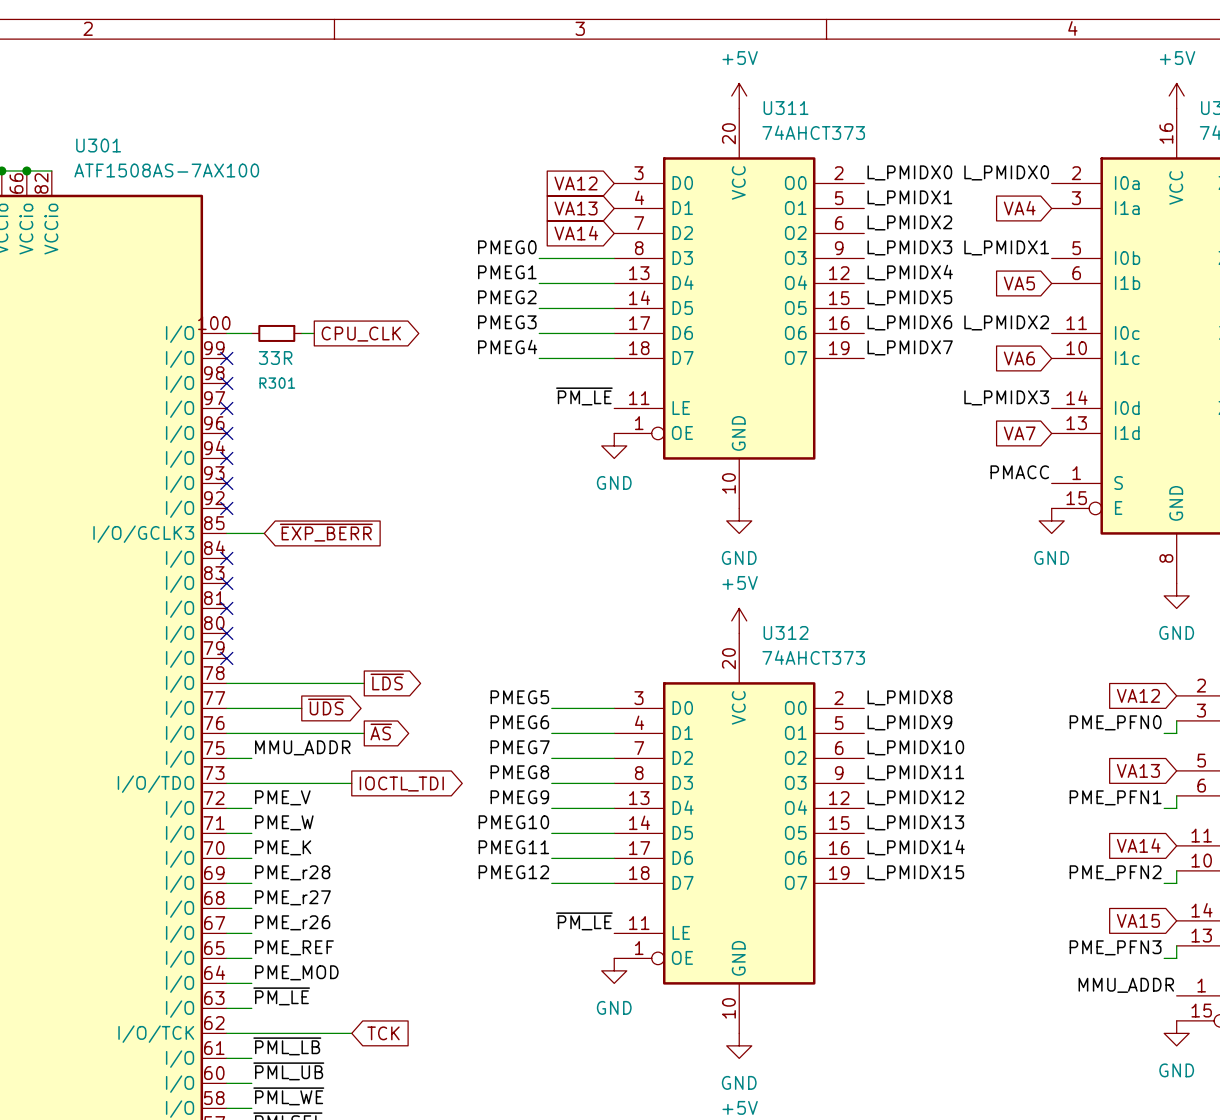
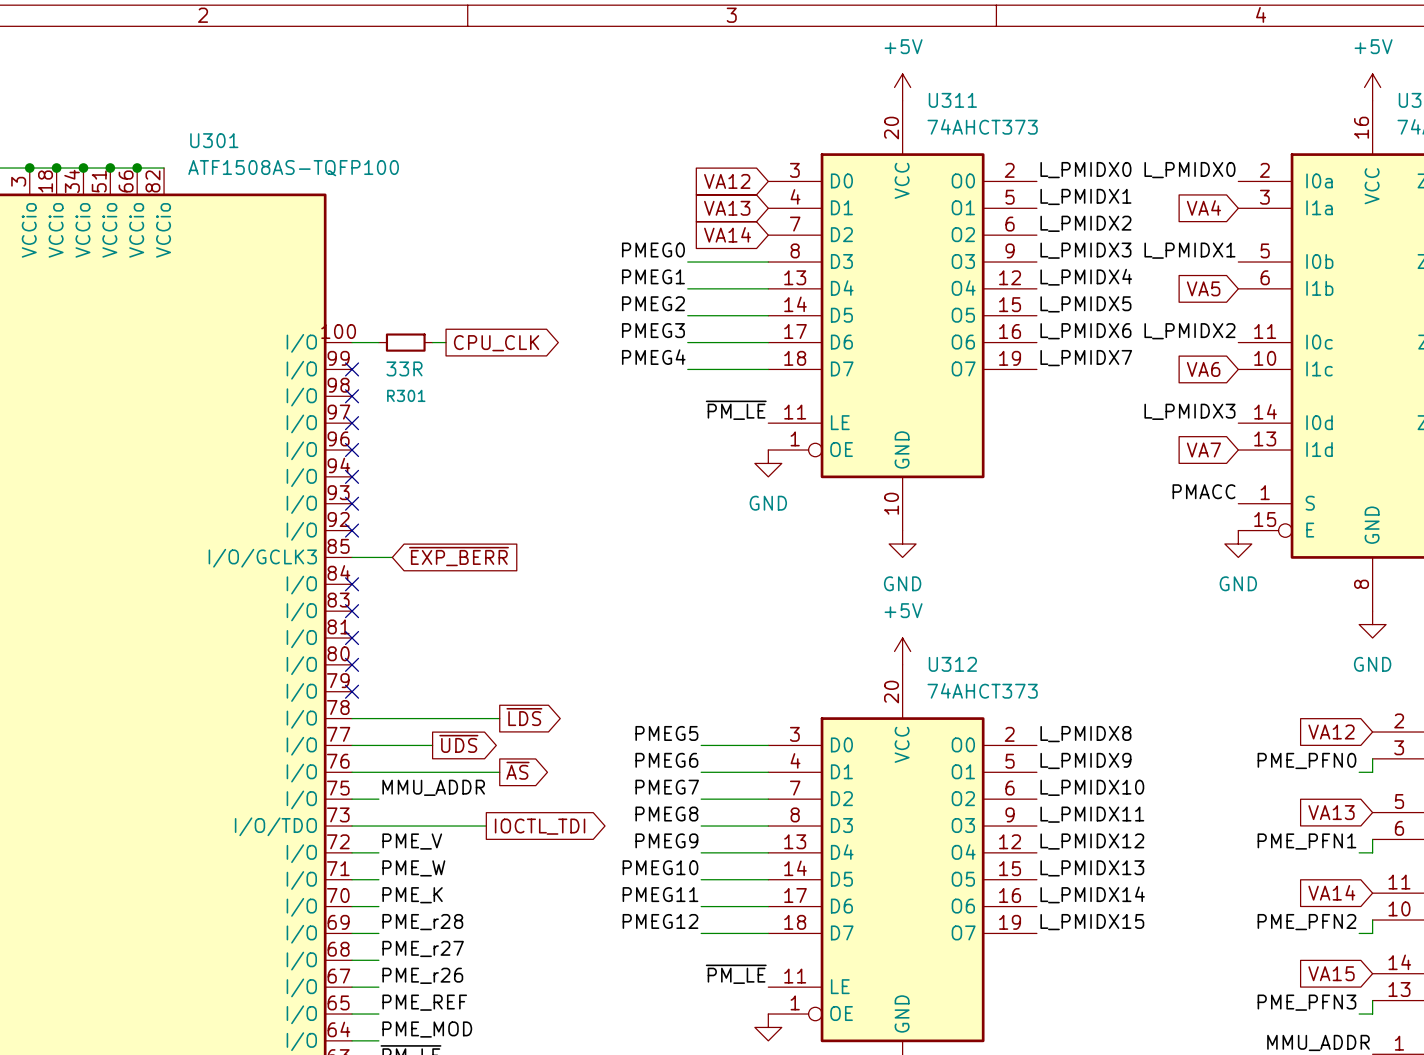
U301 value: ATF1508AS-7AX100 (166, 170) -> ATF1508AS-TQFP100 (293, 168)

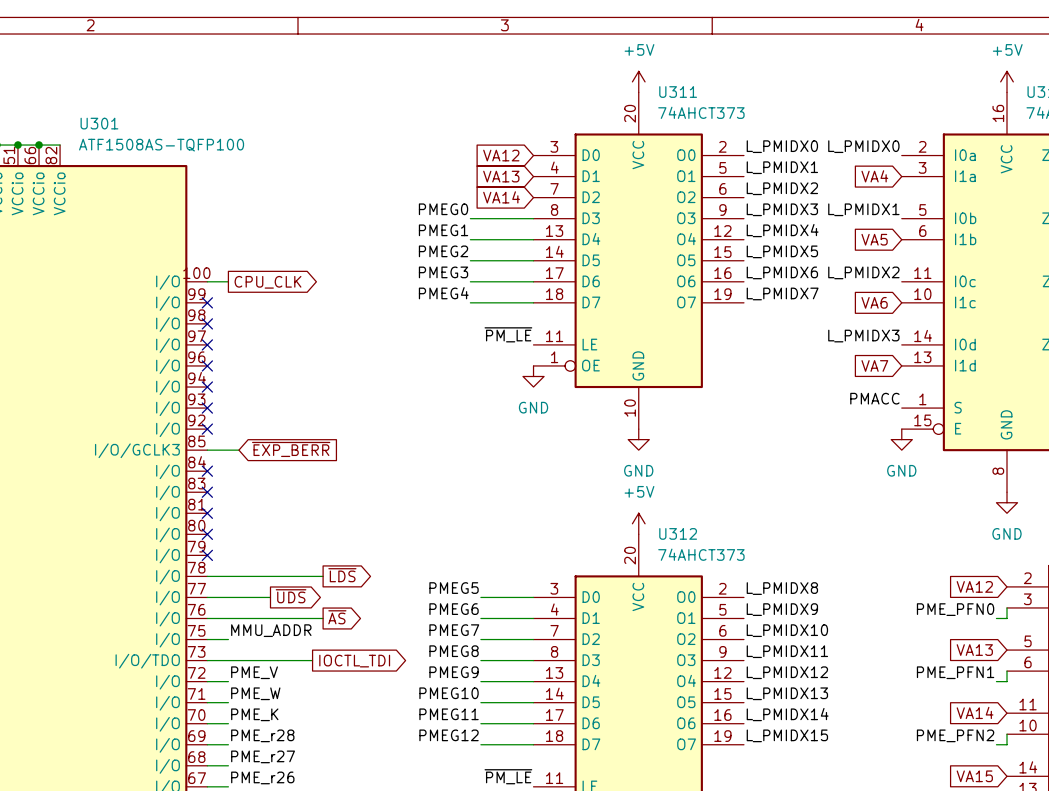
R301: 33R (405, 342) -> none
wire: (432, 342) (446, 342) -> none
global label position: CPU_CLK (496, 343) -> CPU_CLK (268, 282)

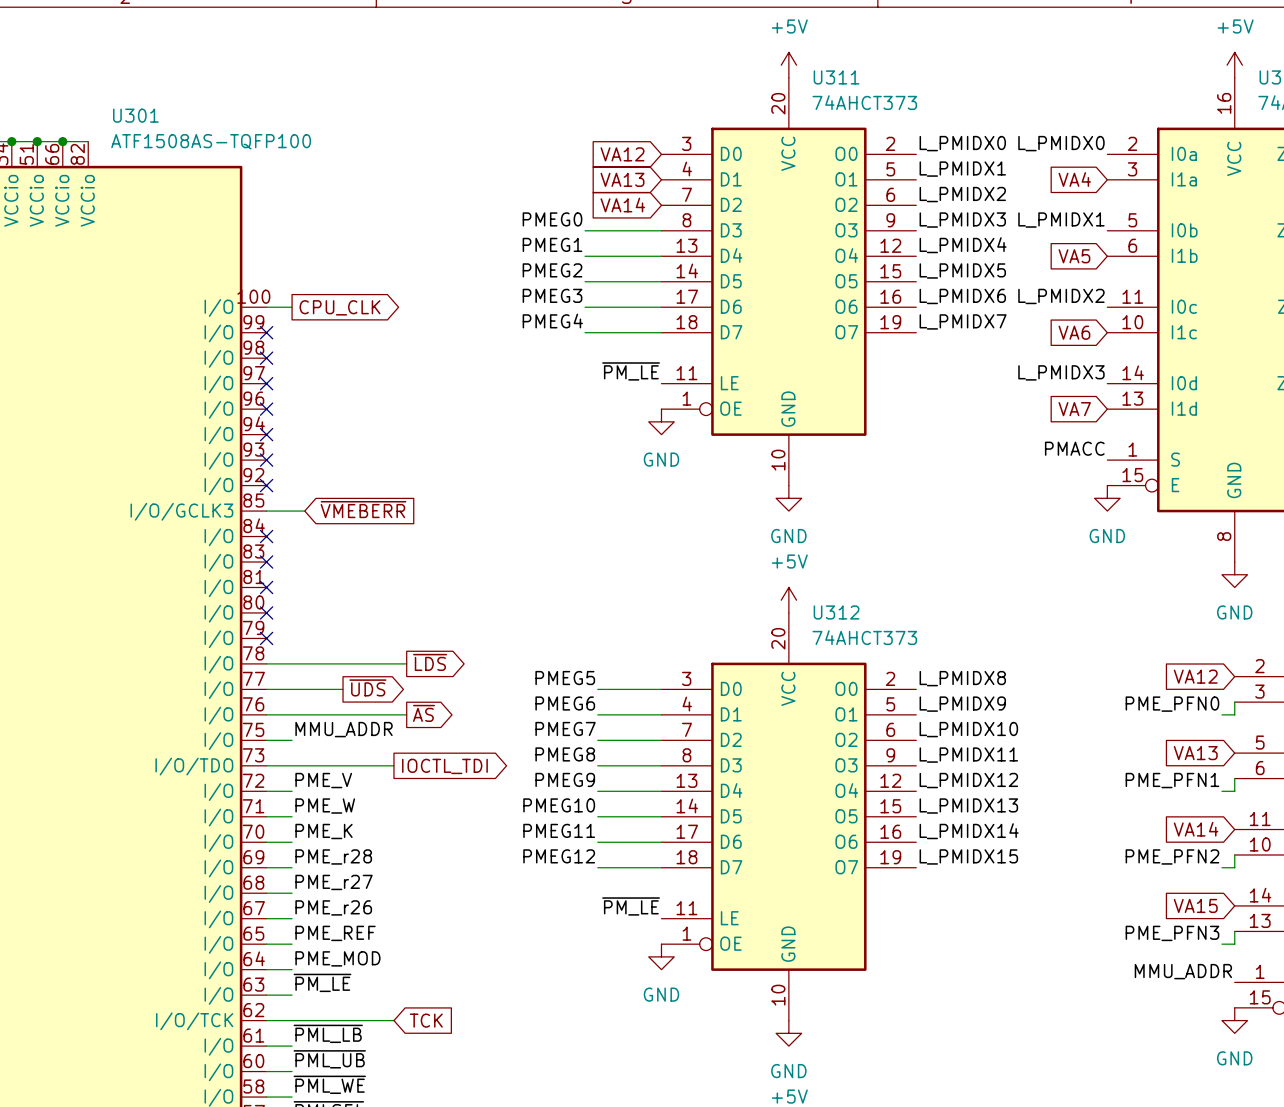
global label: ~{EXP_BERR} (291, 449) -> ~{VMEBERR} (363, 509)

